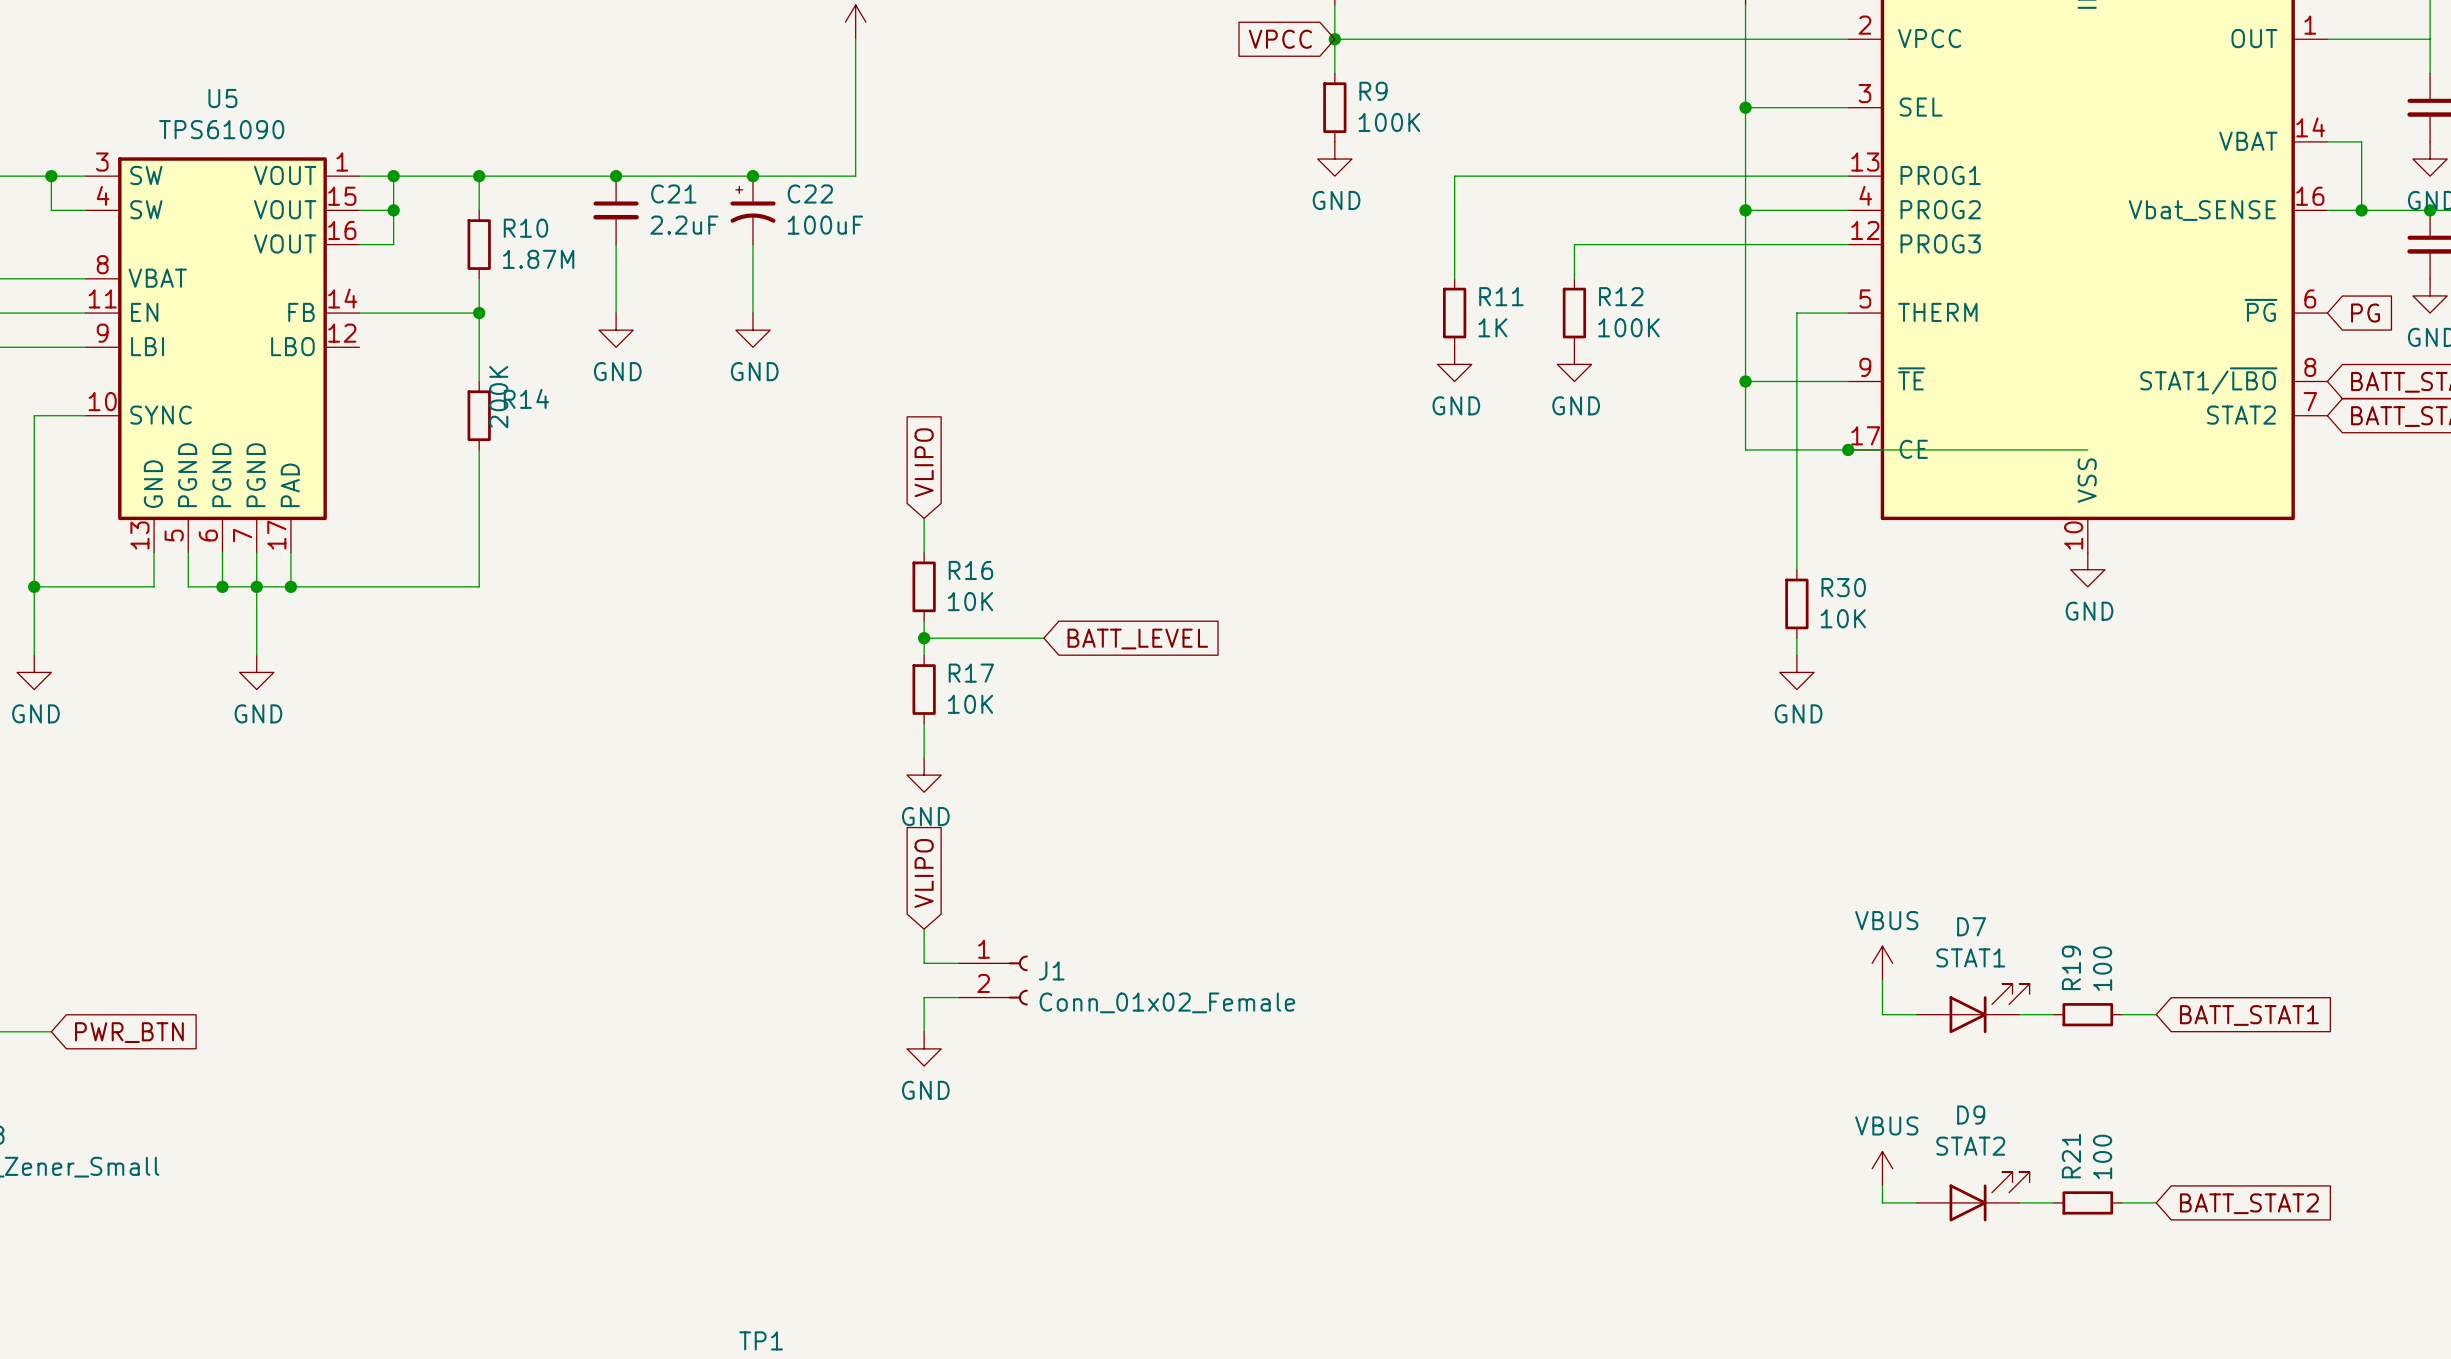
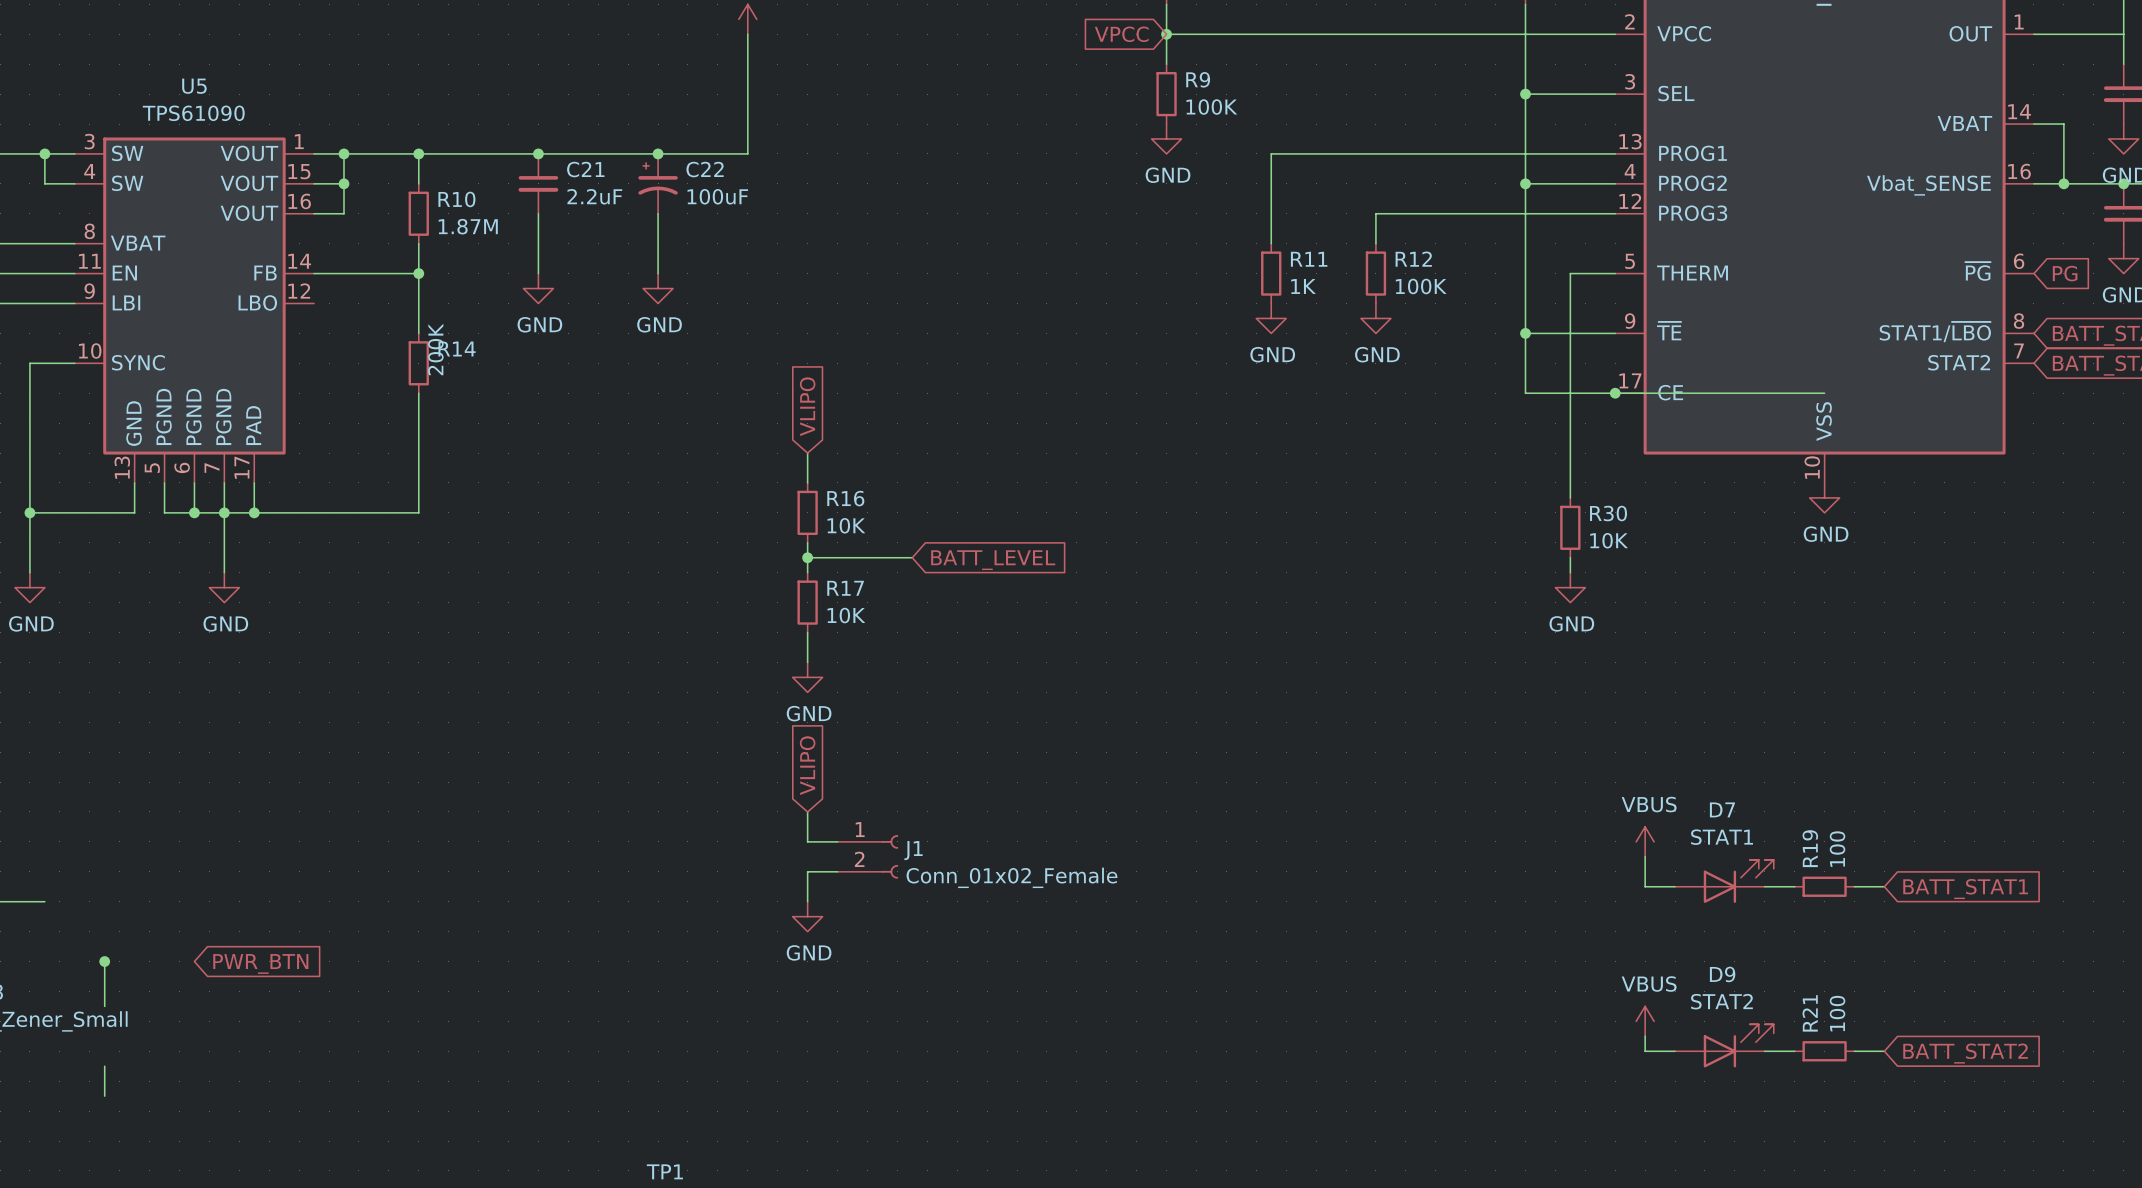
global label position: PWR_BTN (129, 1032) -> PWR_BTN (260, 963)
wire: none -> (104, 961) (104, 1006)
junction: none -> (104, 961)
wire: none -> (104, 1066) (104, 1096)

